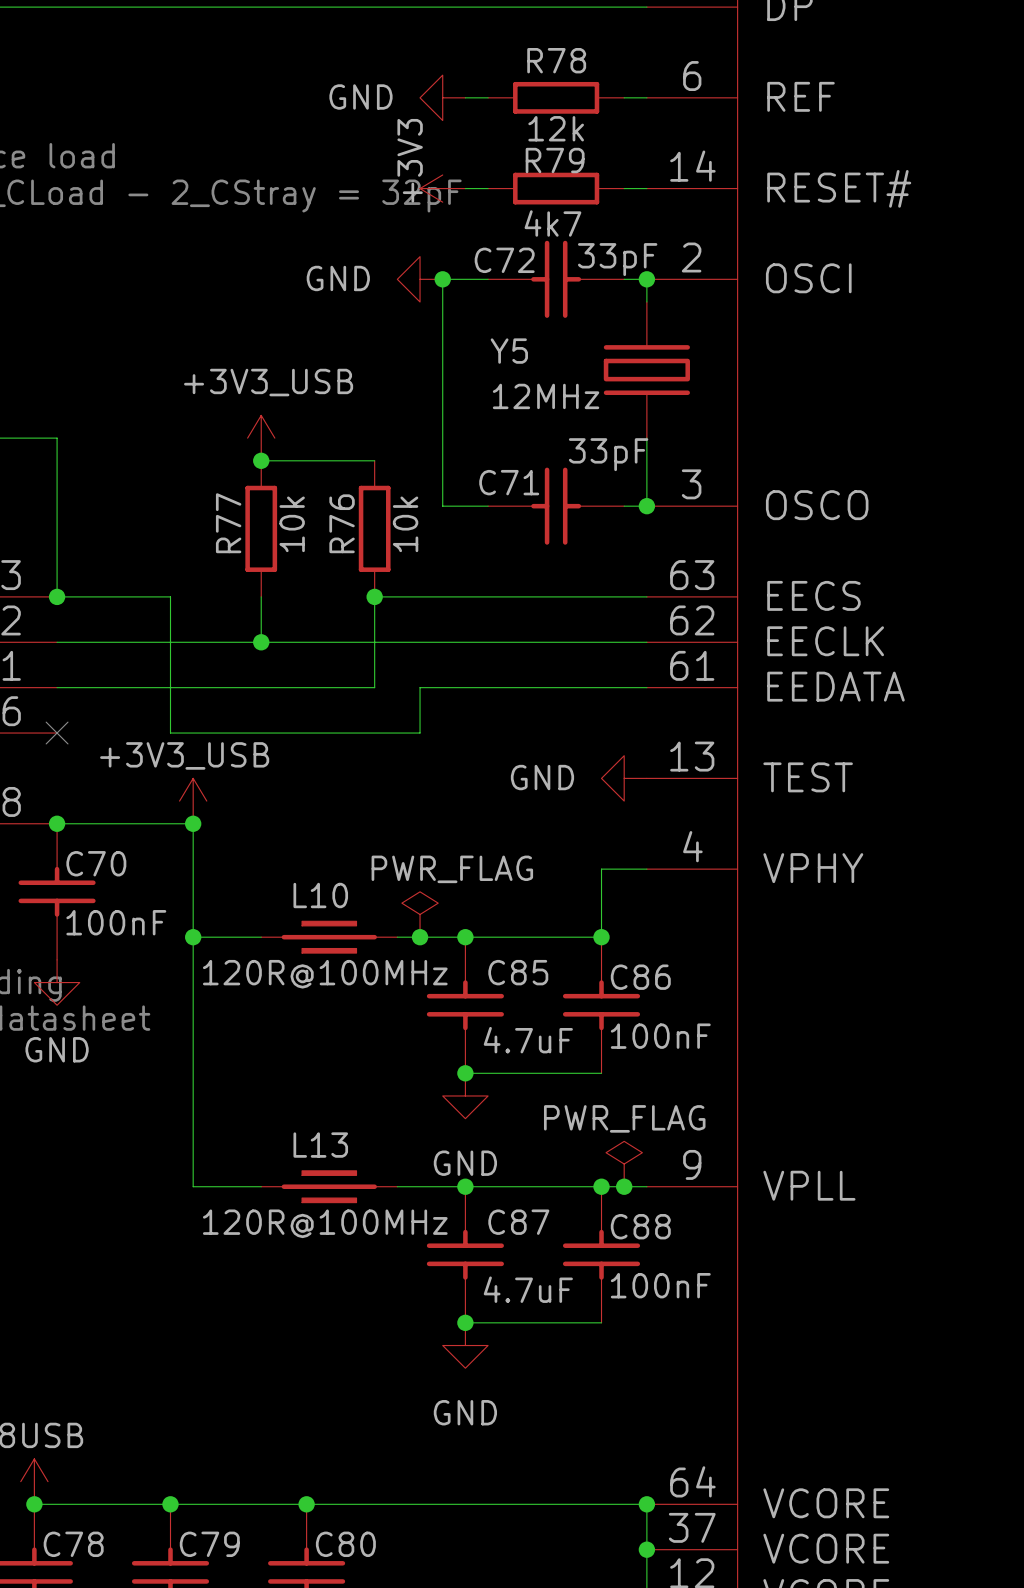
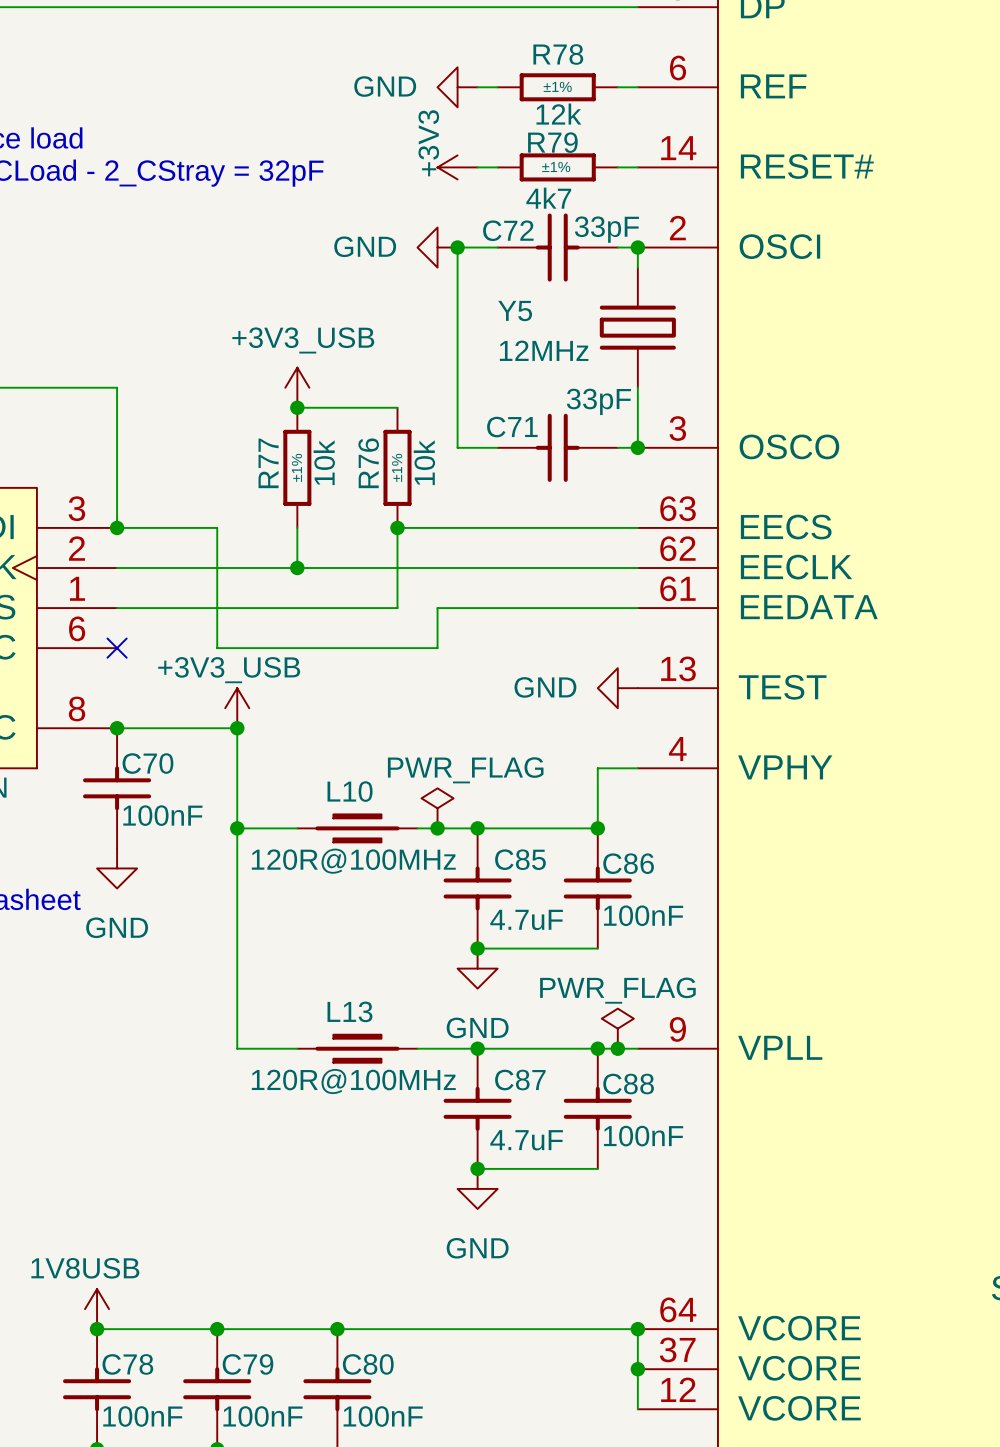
R78 text: none -> ±1% (557, 86)
R79 text: none -> ±1% (556, 167)
R77 text: none -> ±1% (296, 467)
R76 text: none -> ±1% (397, 467)

